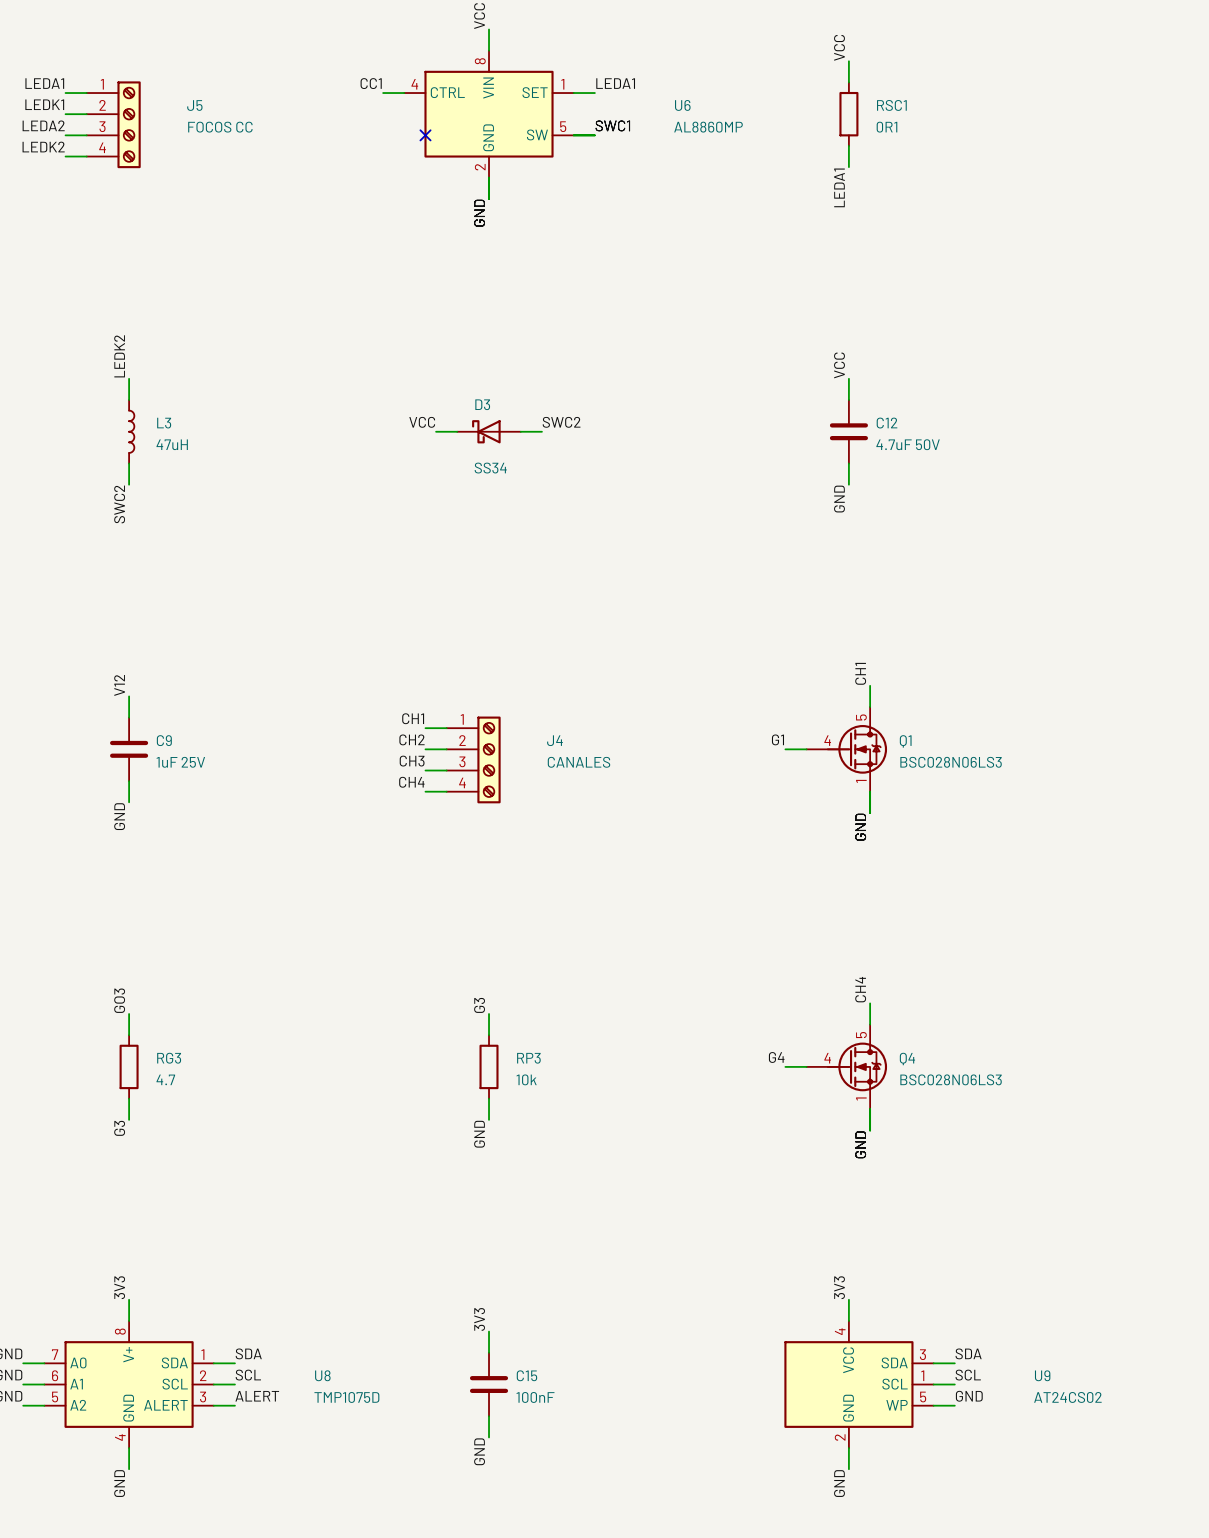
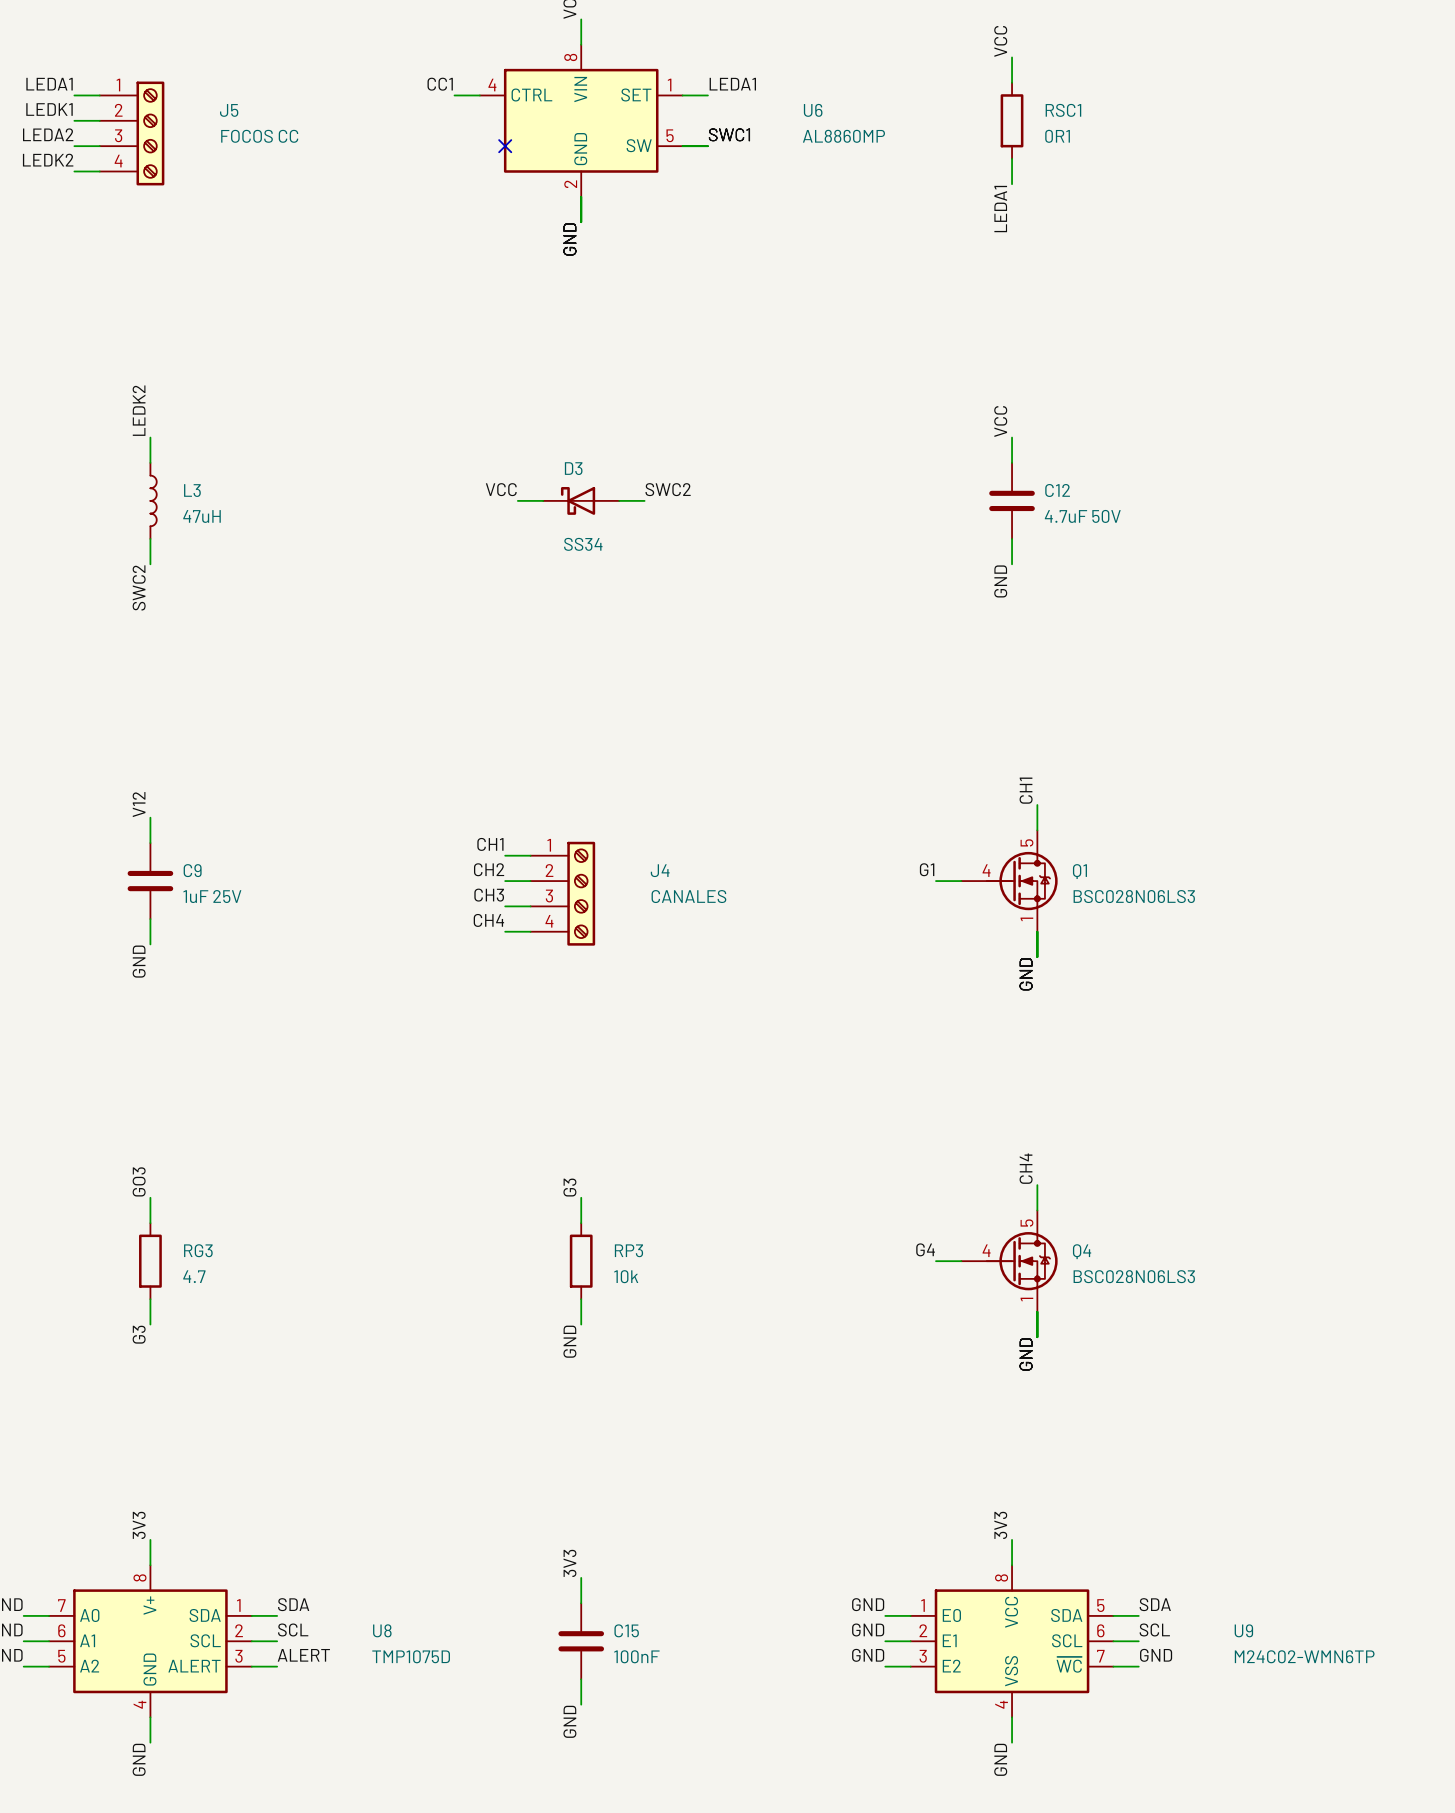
U9 symbol: [784, 1321, 934, 1449] -> [910, 1565, 1114, 1718]
label: none -> GND (868, 1604)
wire: none -> (885, 1615) (910, 1615)
label: none -> GND (868, 1629)
wire: none -> (885, 1641) (910, 1641)
label: none -> GND (868, 1655)
U9 value: AT24CS02 (1067, 1397) -> M24C02-WMN6TP (1304, 1656)
wire: none -> (885, 1666) (910, 1666)

